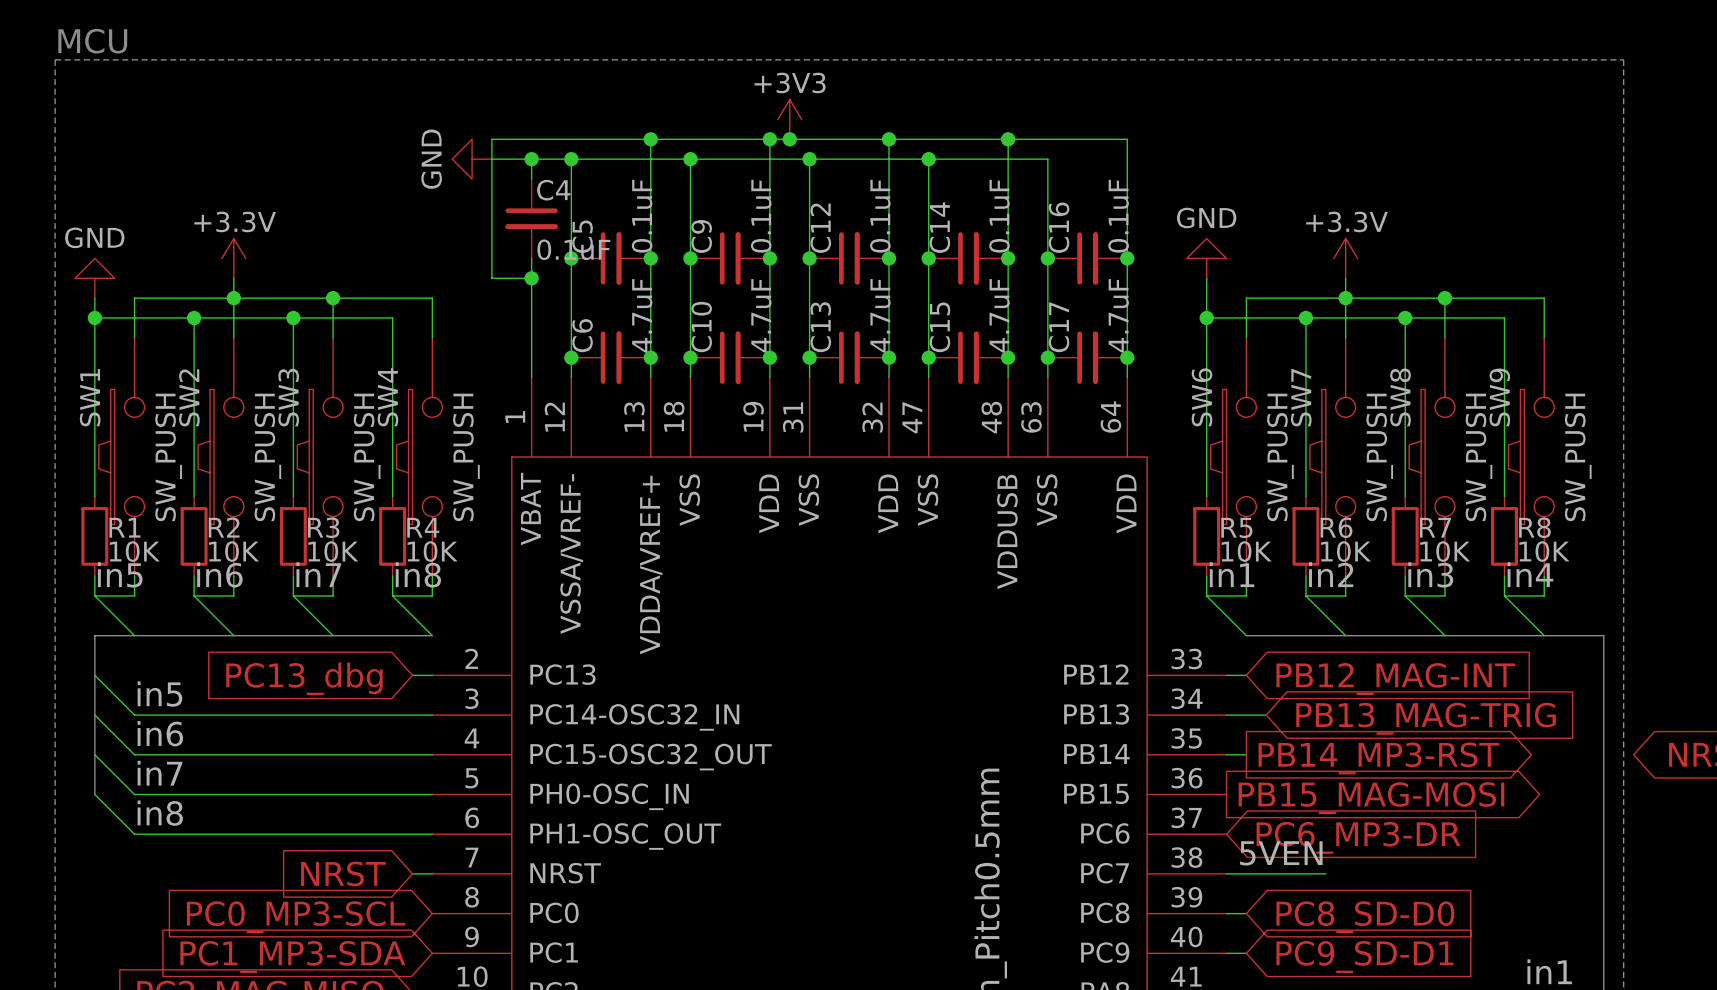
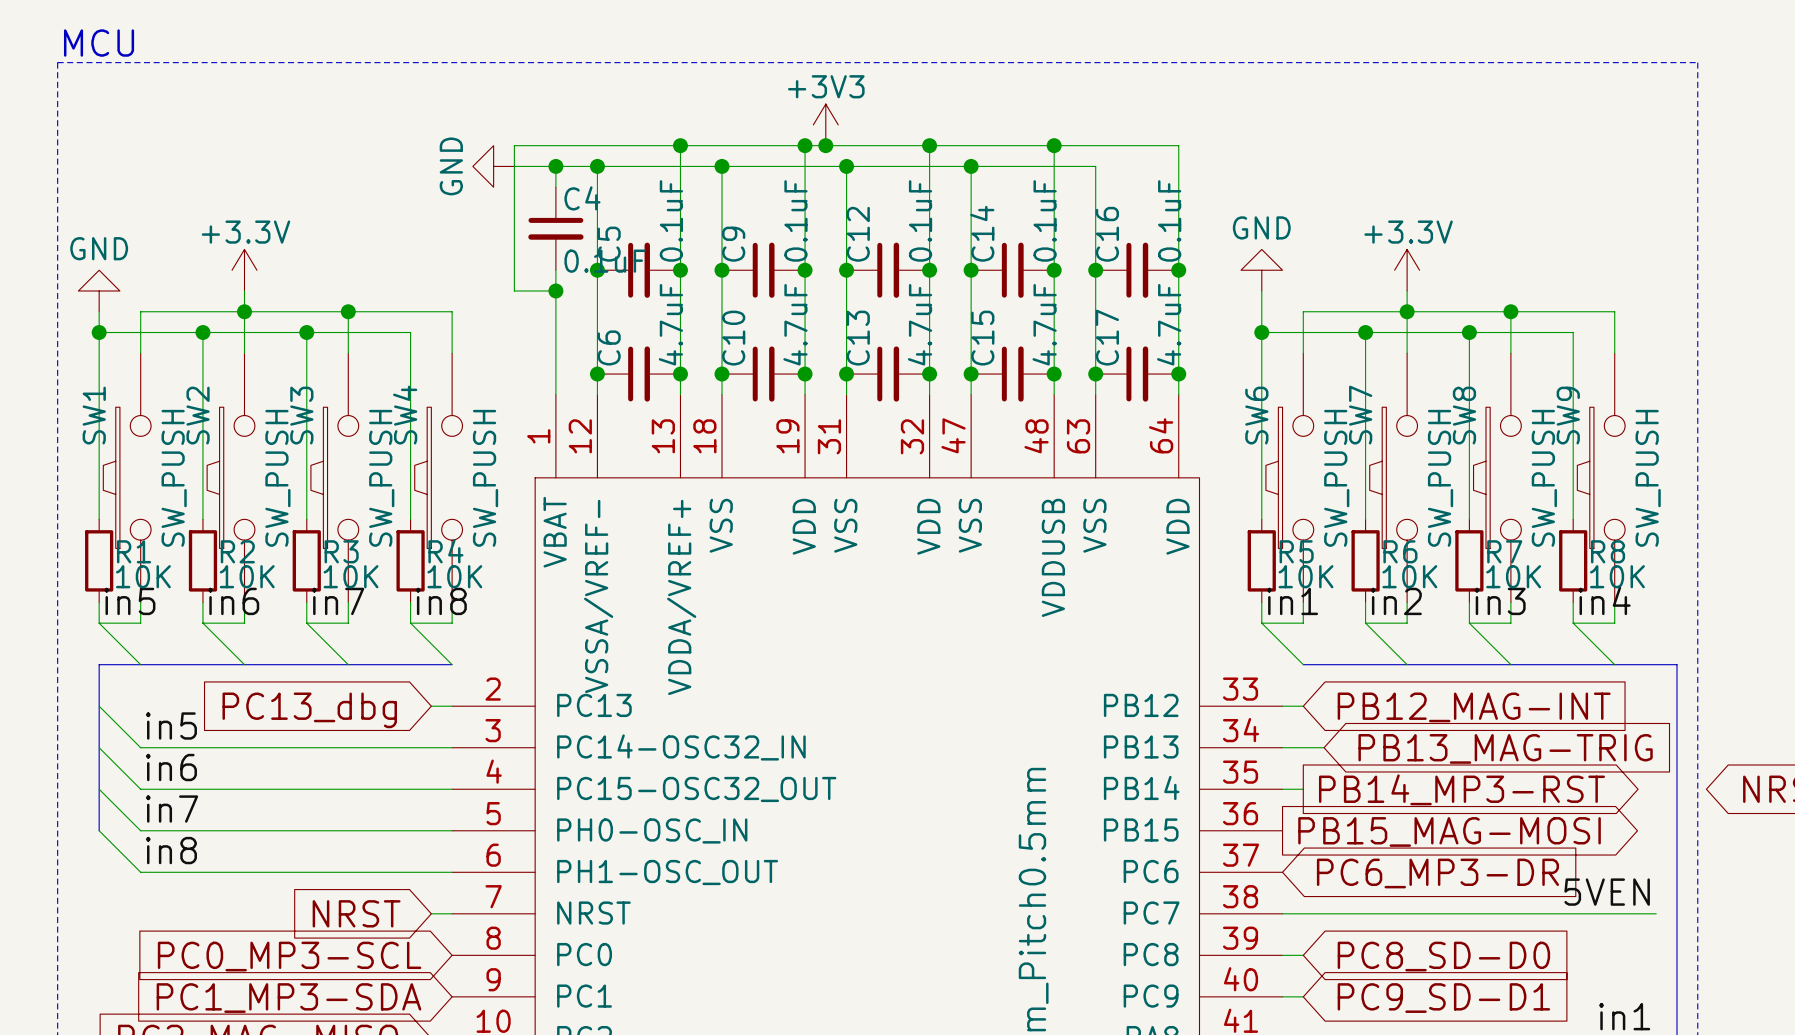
label position: 5VEN (1281, 853) -> 5VEN (1607, 892)
wire: none -> (1386, 913) (1656, 913)

